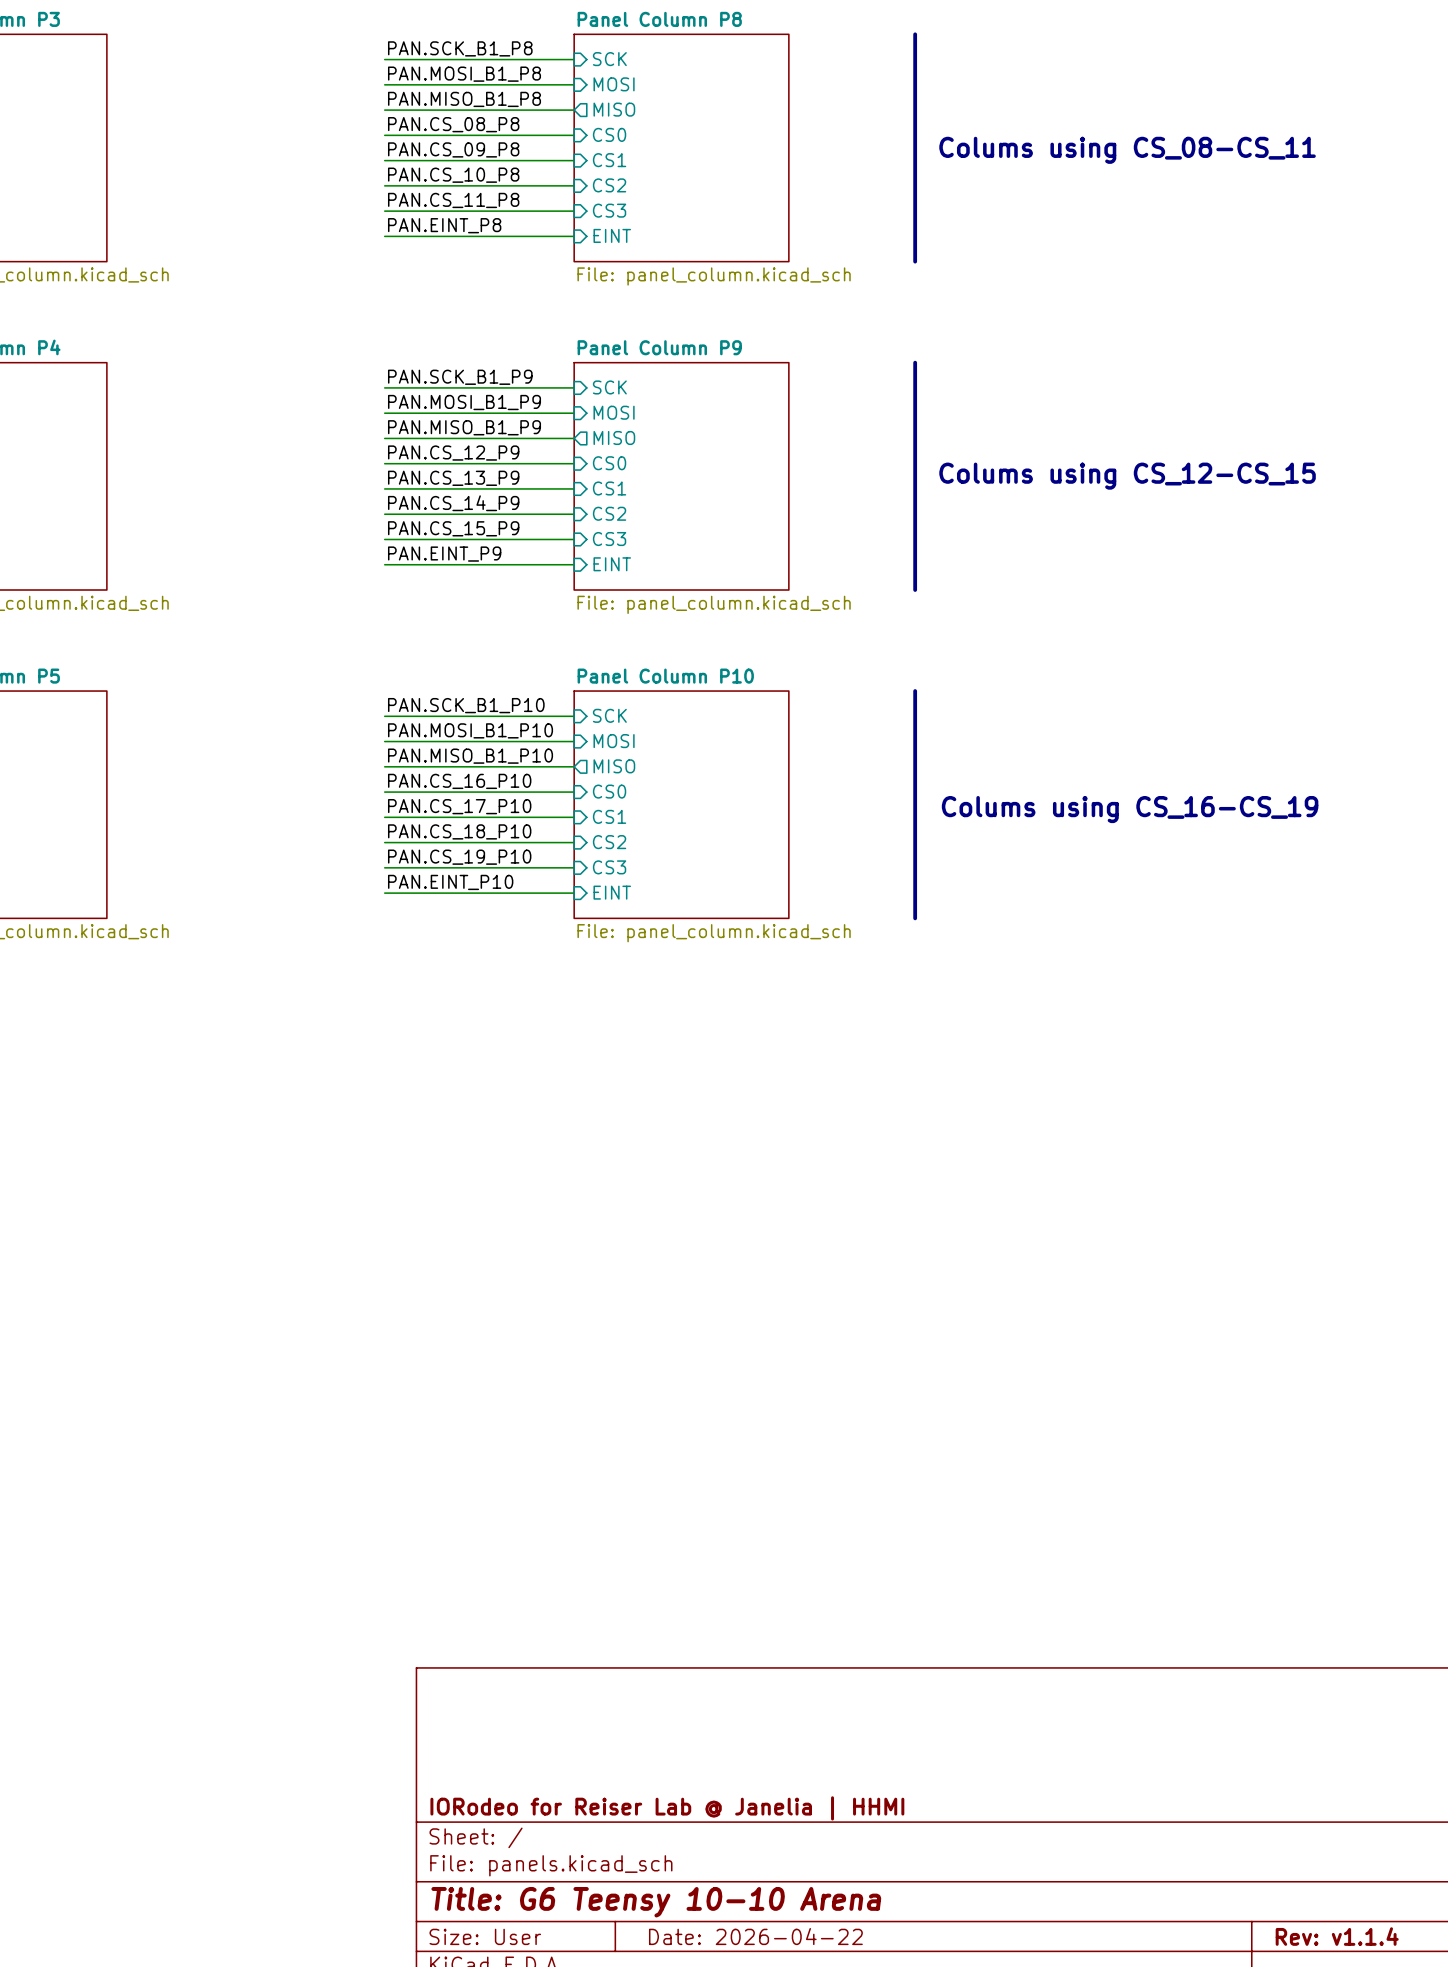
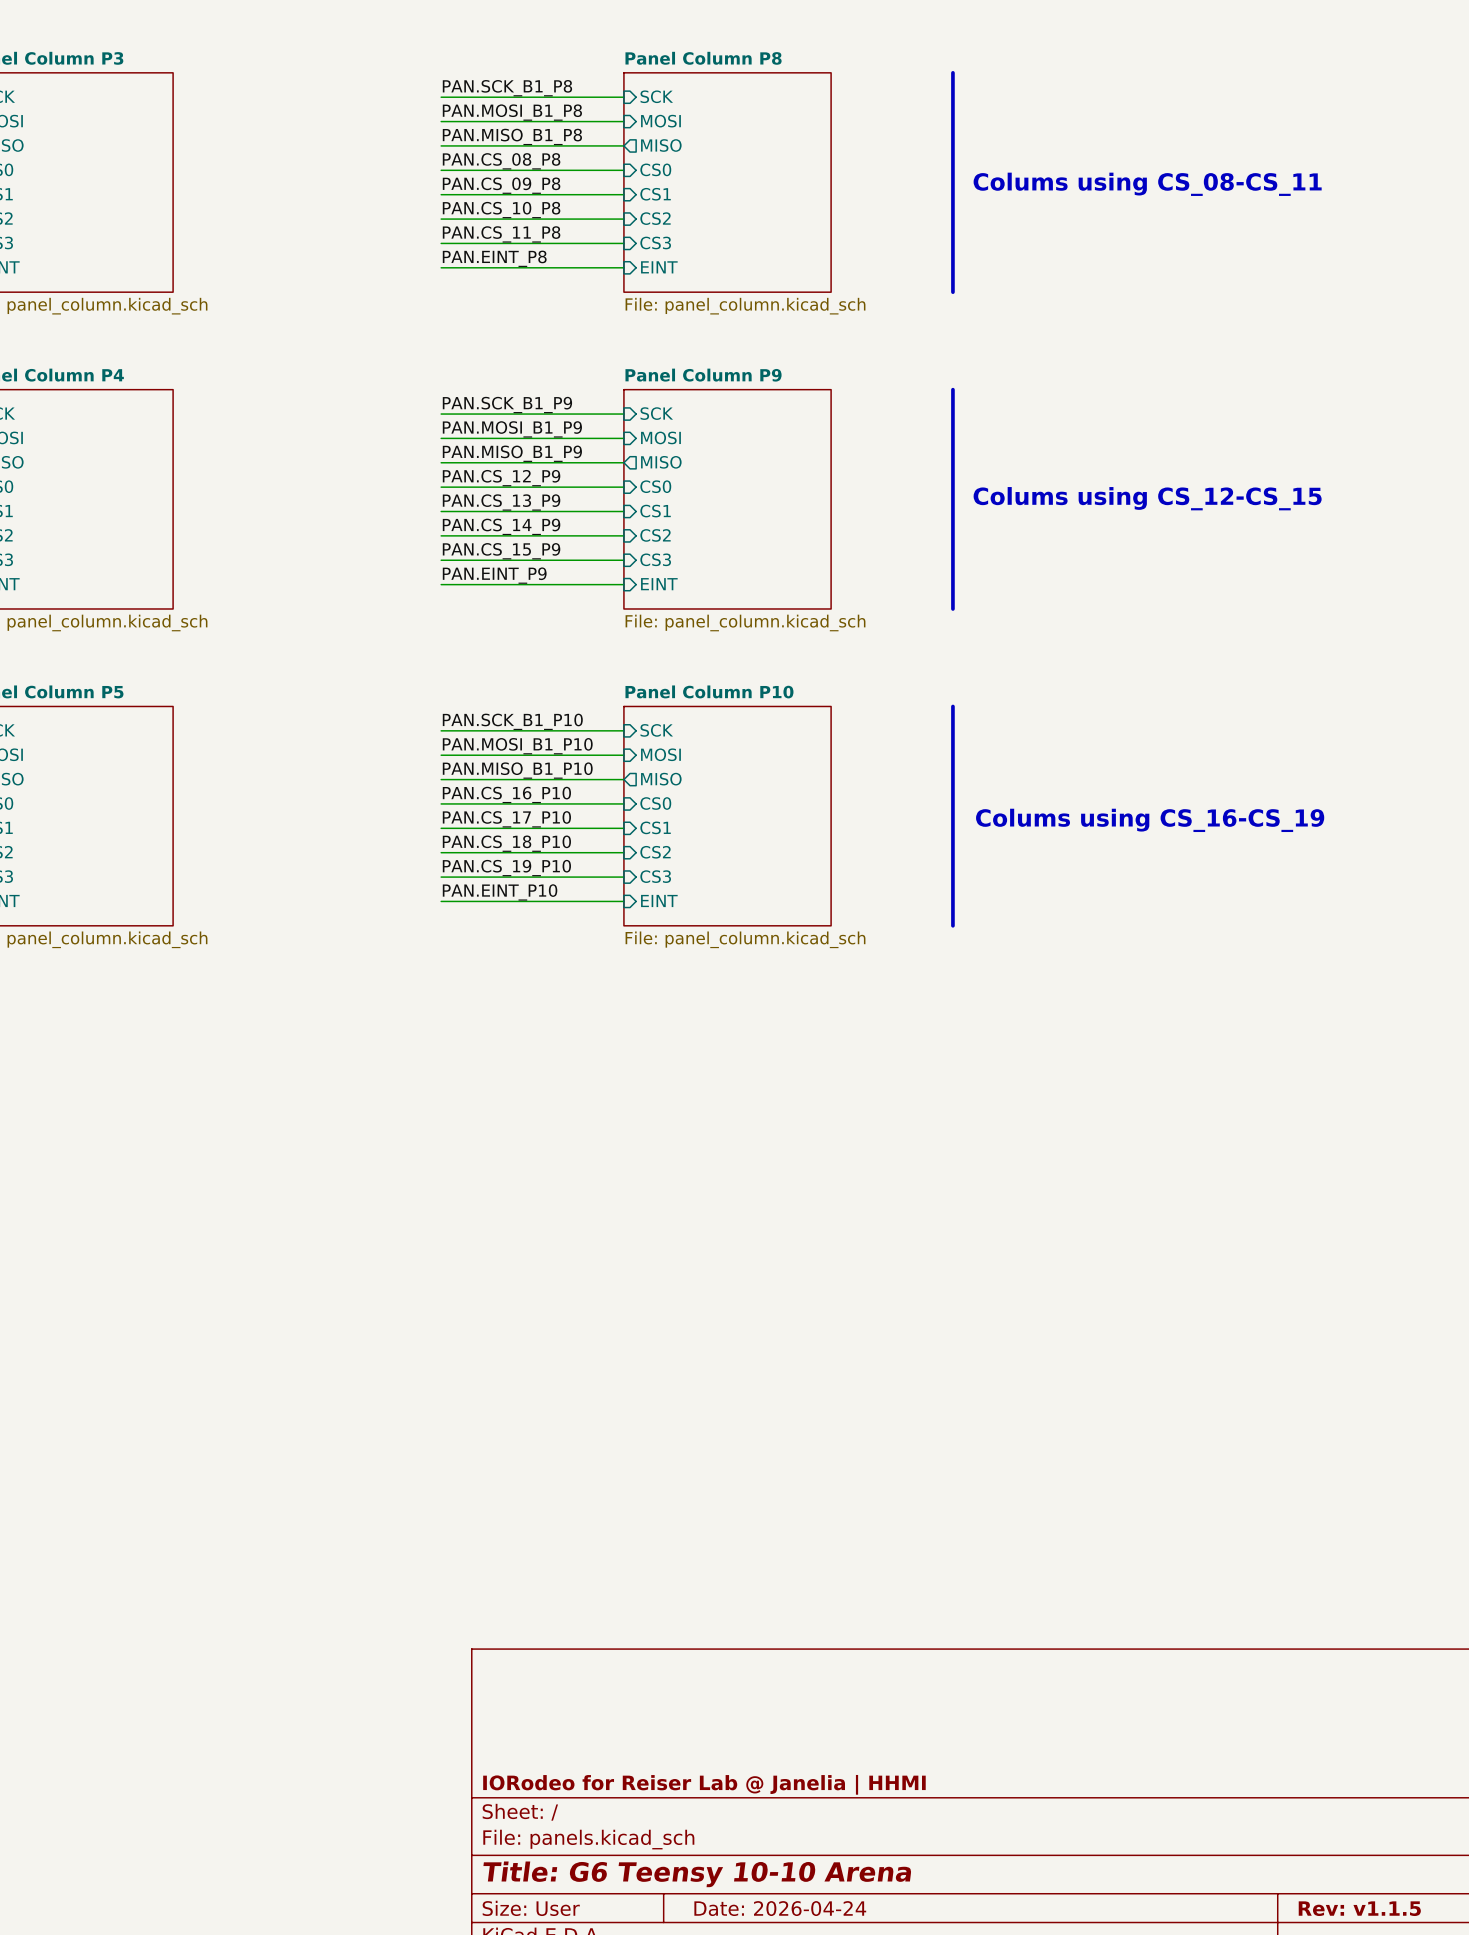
title block: Date: 2026-04-22 (755, 1936) -> Date: 2026-04-24 (780, 1908)
title block: Rev: v1.1.4 (1337, 1936) -> Rev: v1.1.5 (1359, 1908)

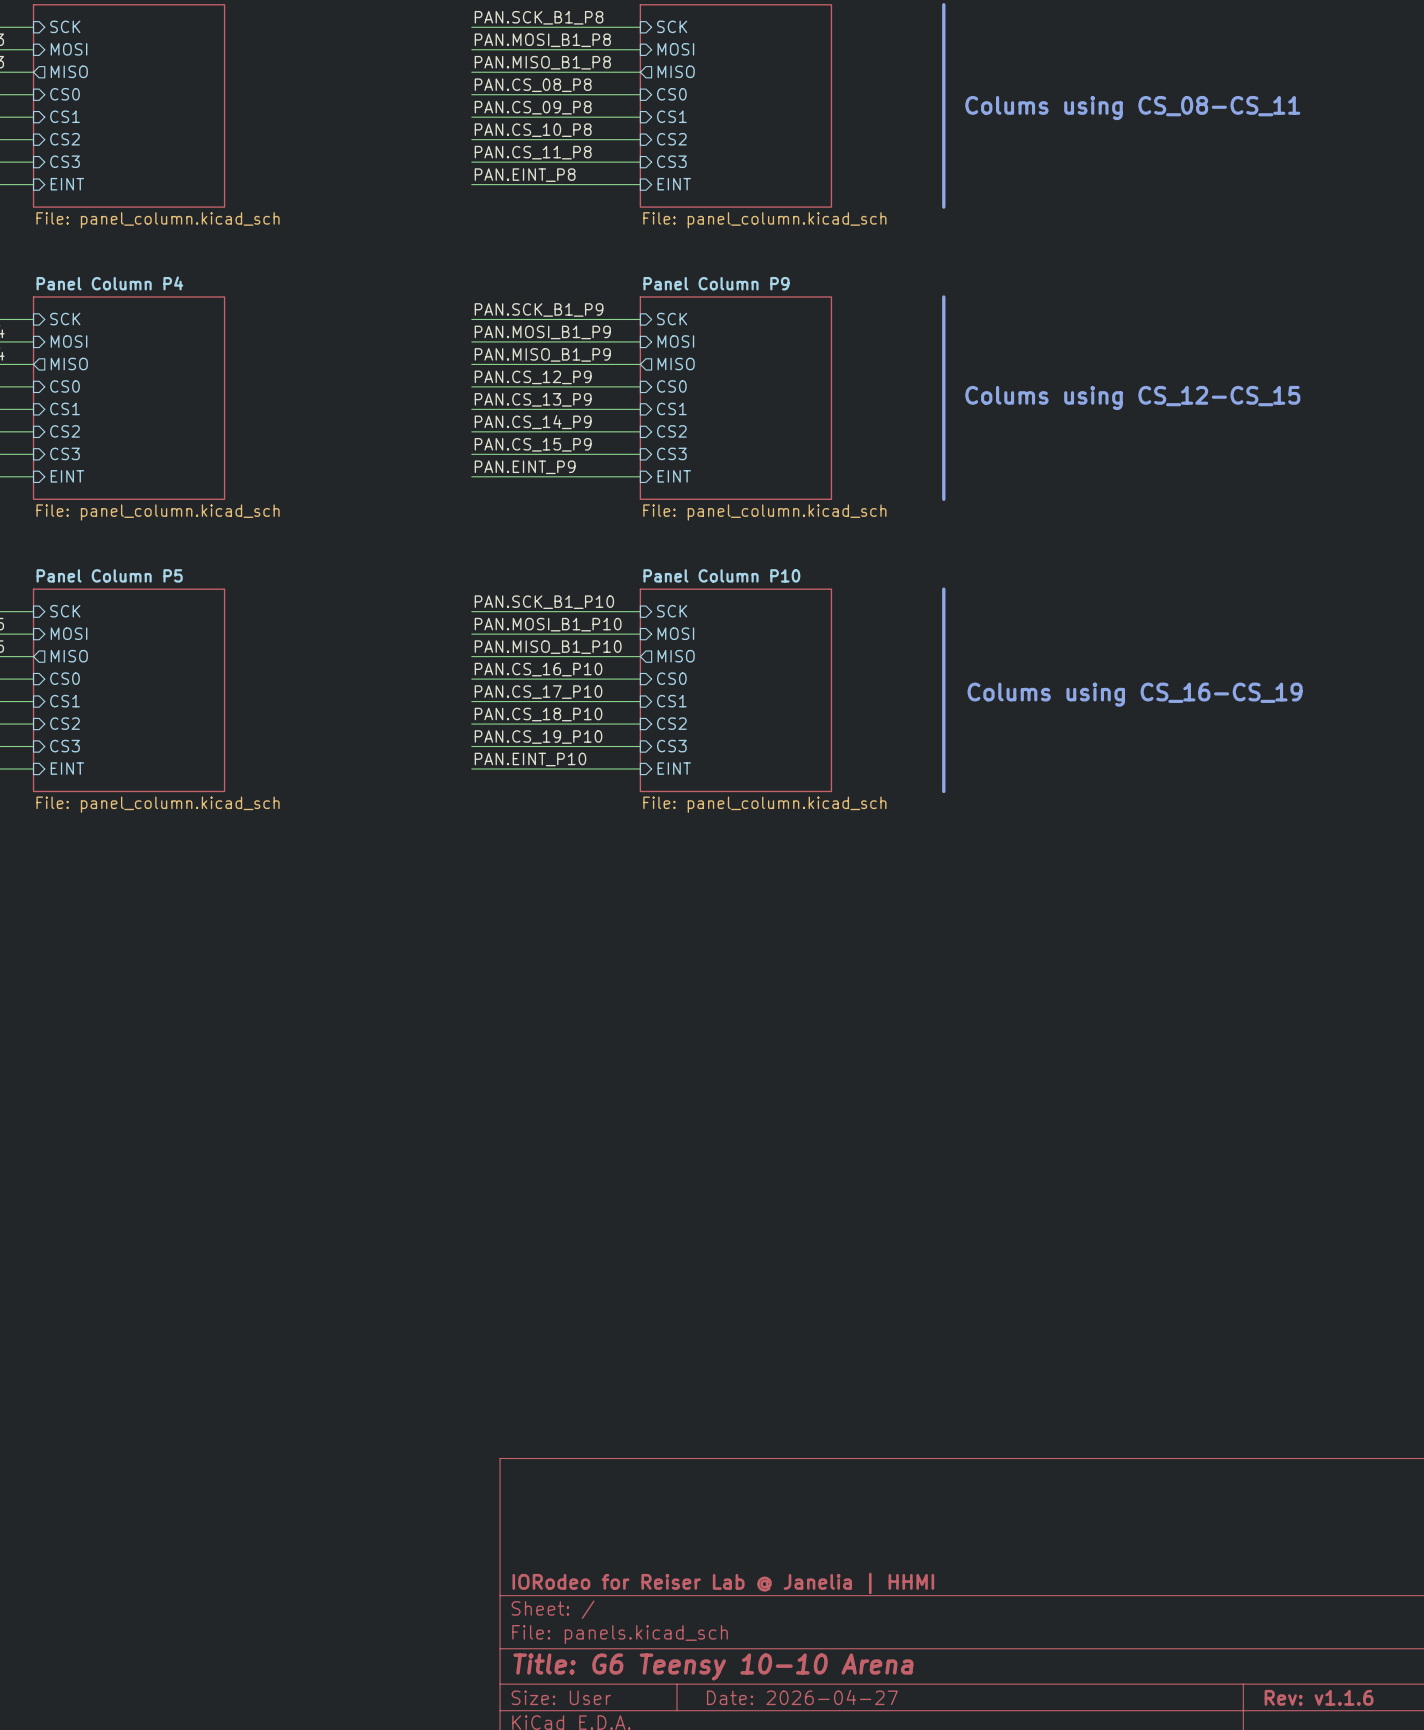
title block: Date: 2026-04-24 (780, 1908) -> Date: 2026-04-27 (802, 1697)
title block: Rev: v1.1.5 (1359, 1908) -> Rev: v1.1.6 (1319, 1697)

